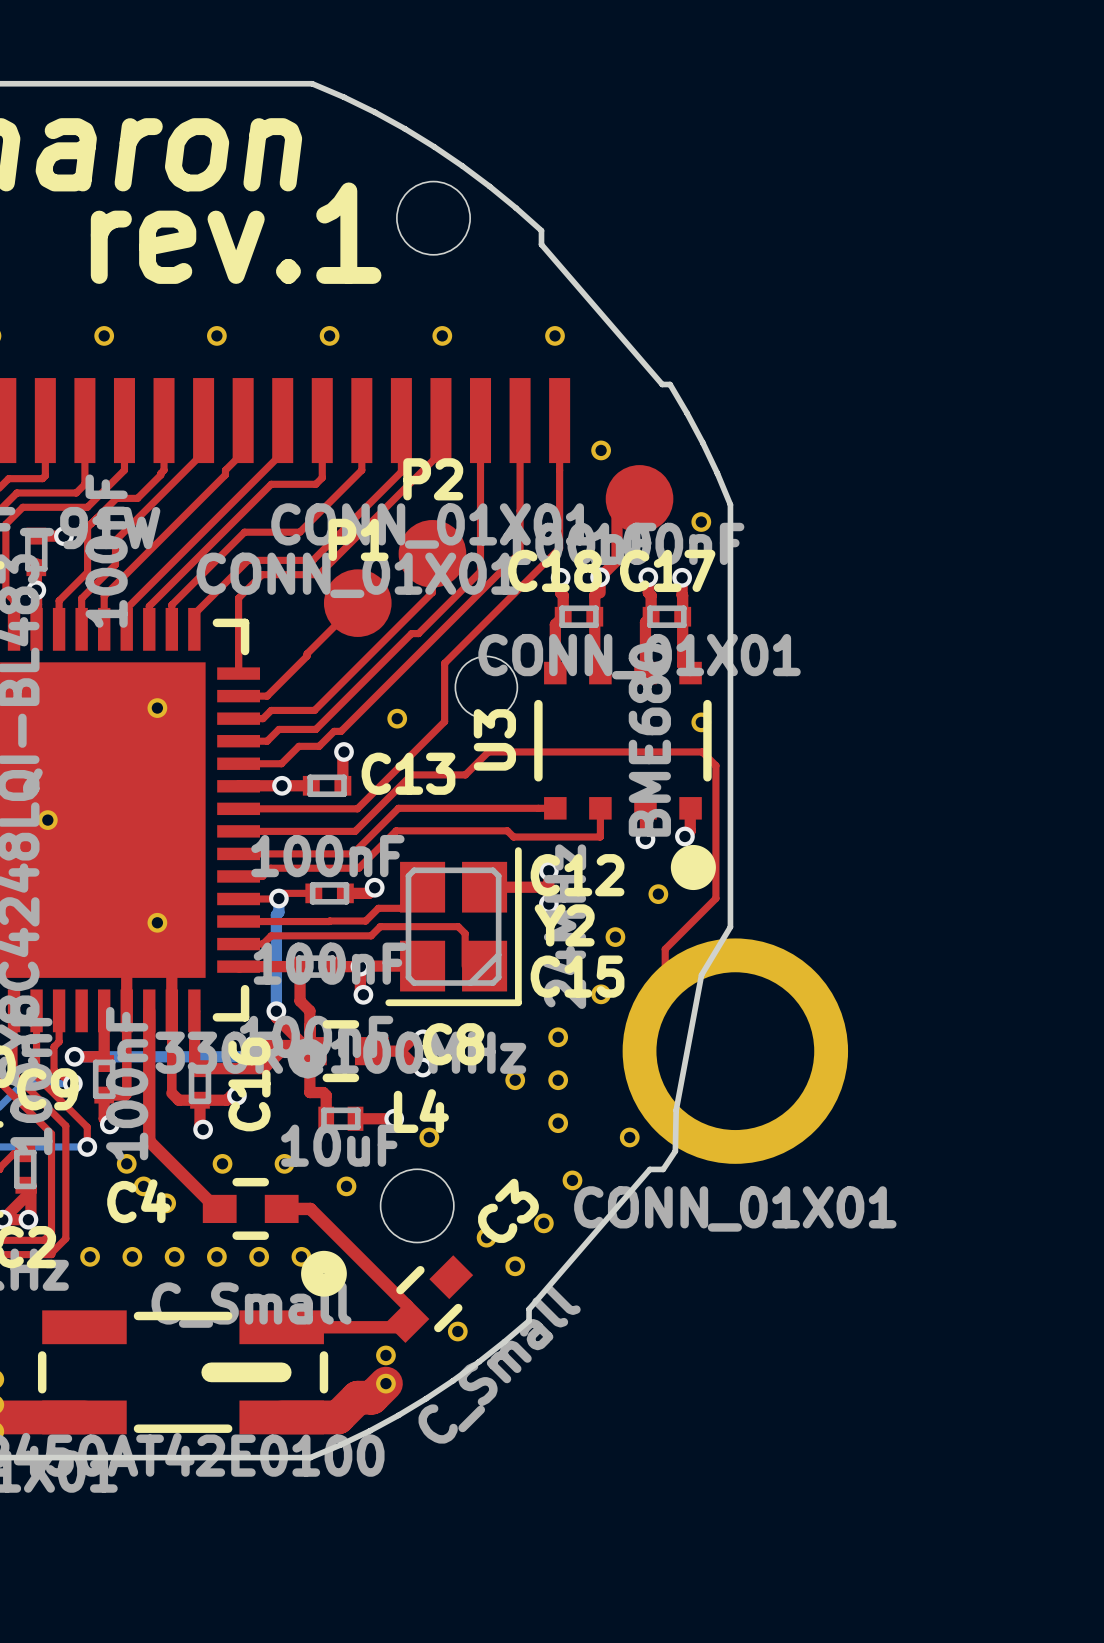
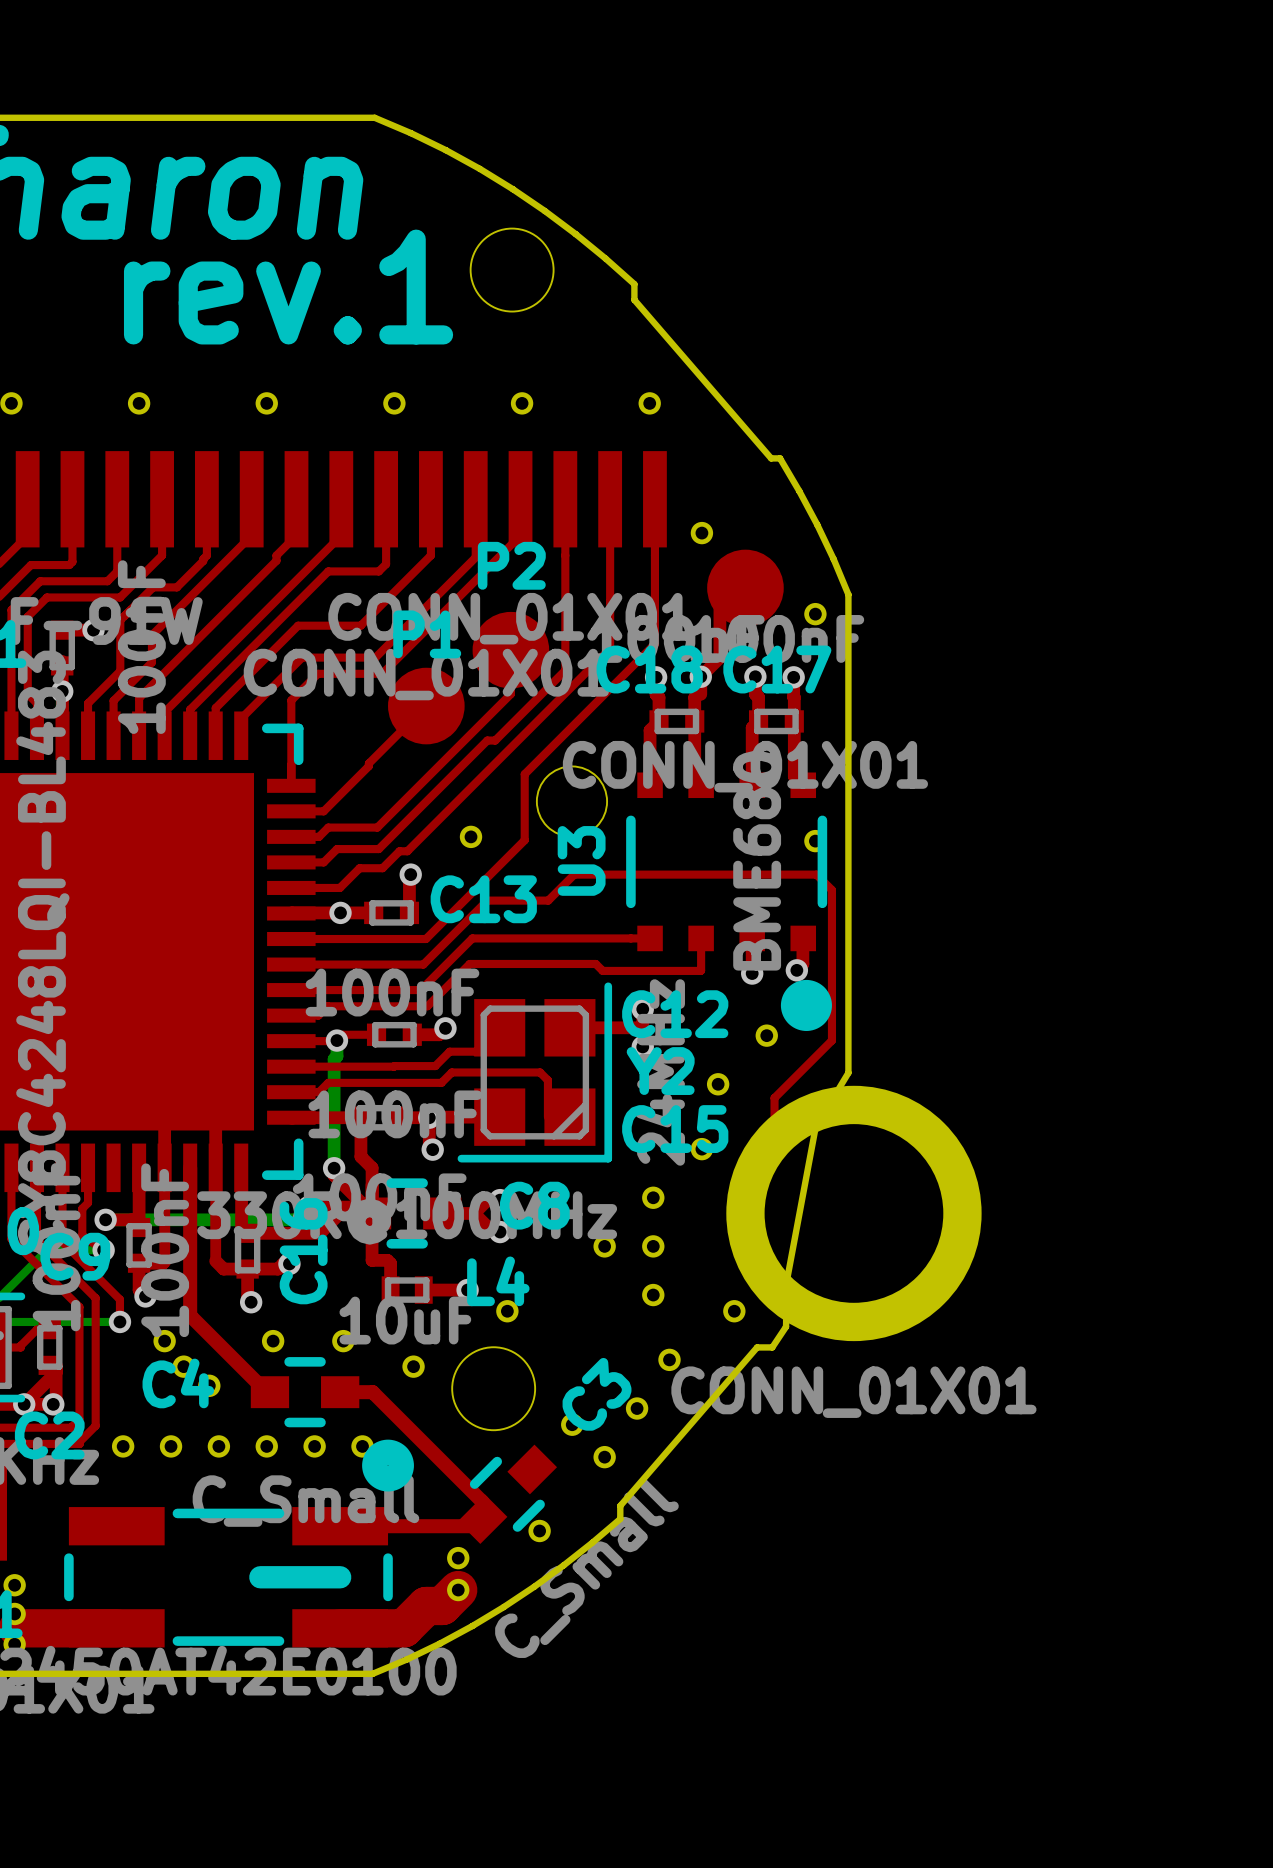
part: (157, 708) -> none
part: (47, 820) -> none
part: (157, 922) -> none

